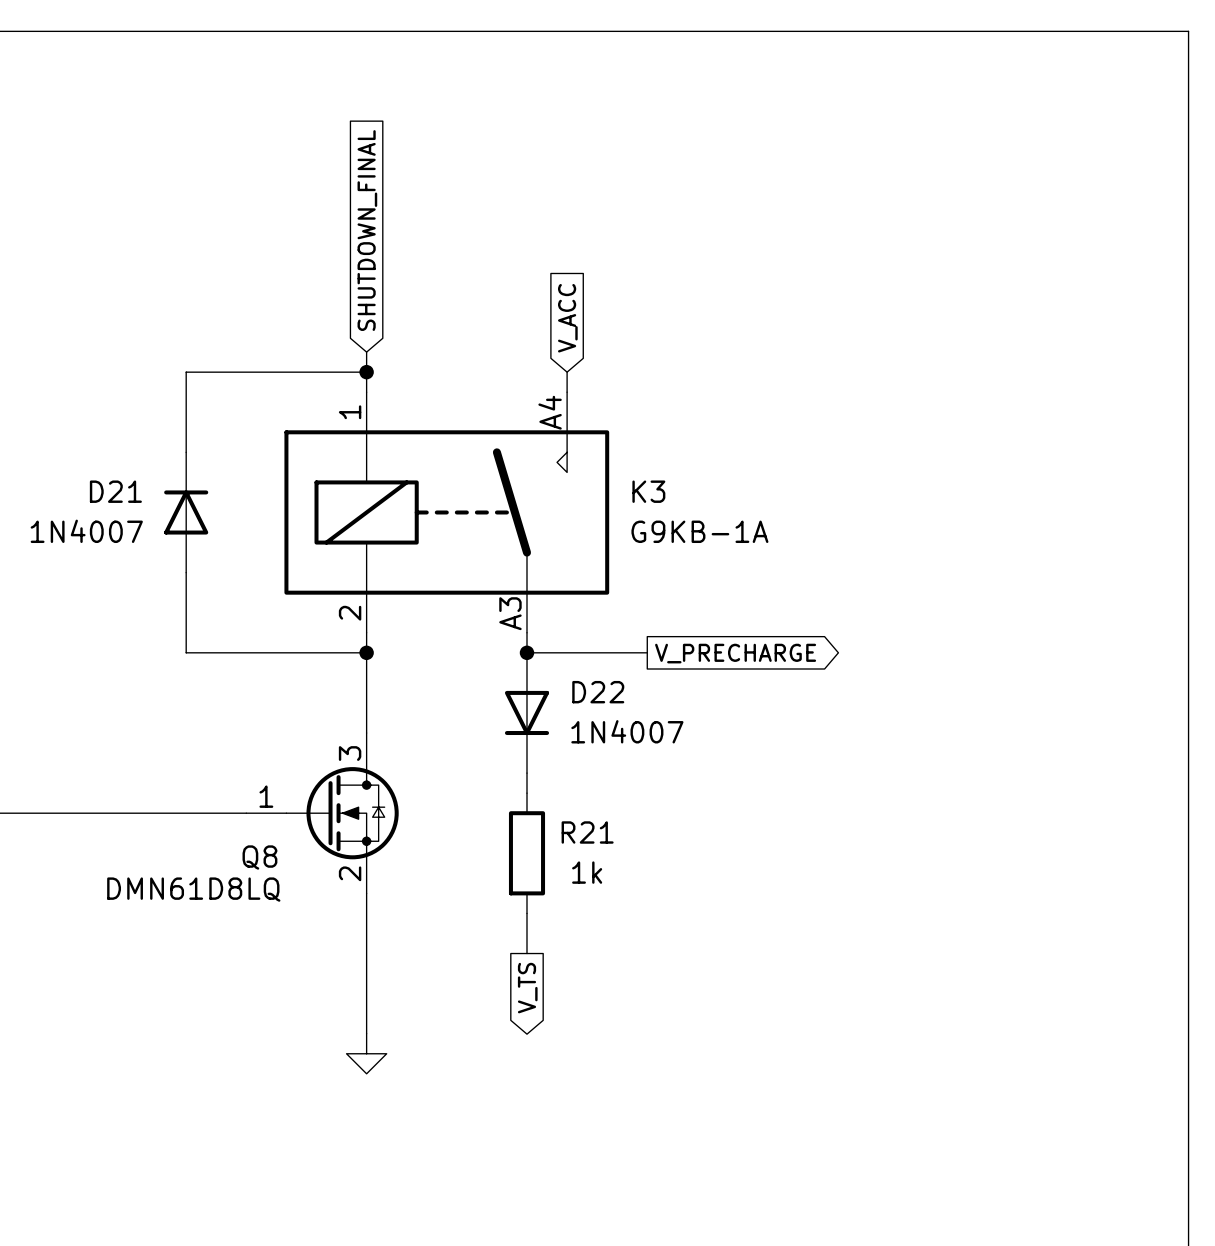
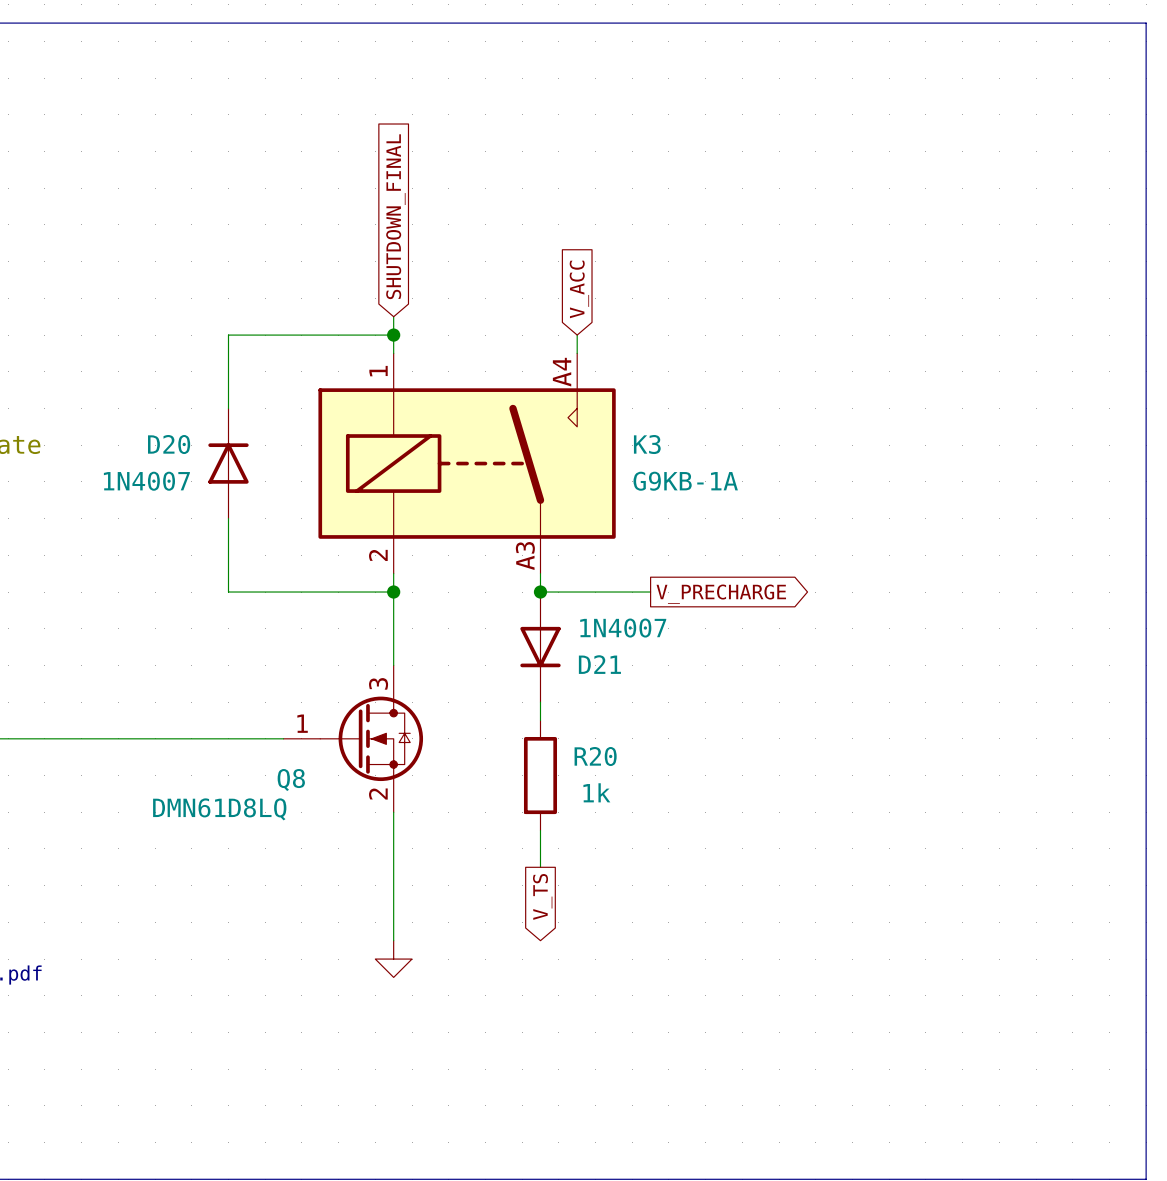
D21 name: D21 (115, 491) -> D20 (169, 444)
D22 name: D22 (598, 692) -> D21 (599, 664)
D22 value position: 1N4007 (627, 731) -> 1N4007 (623, 628)
R21 name: R21 (587, 832) -> R20 (595, 756)

